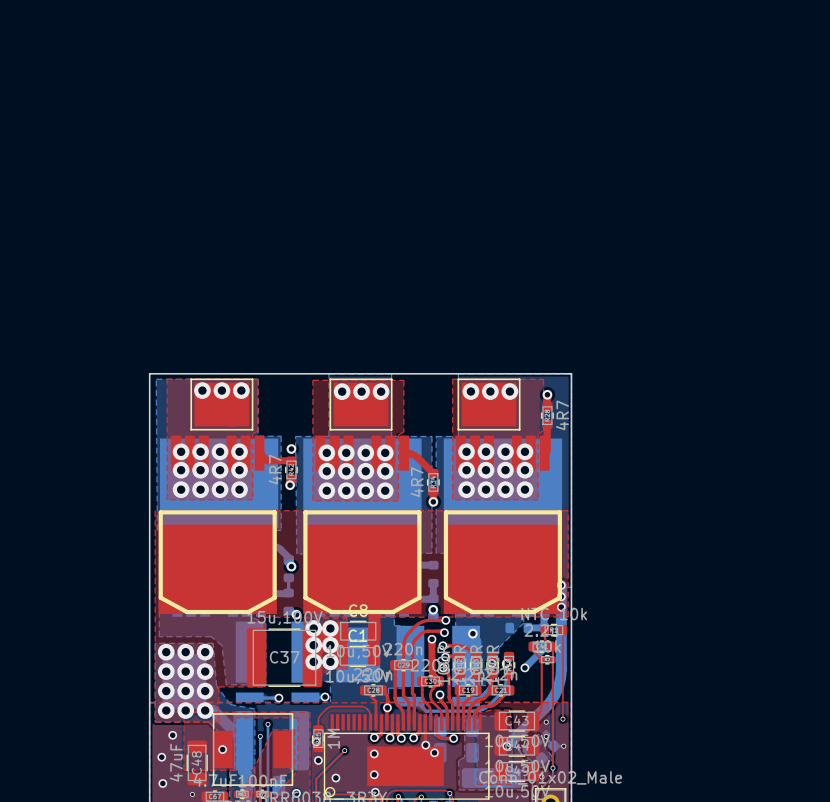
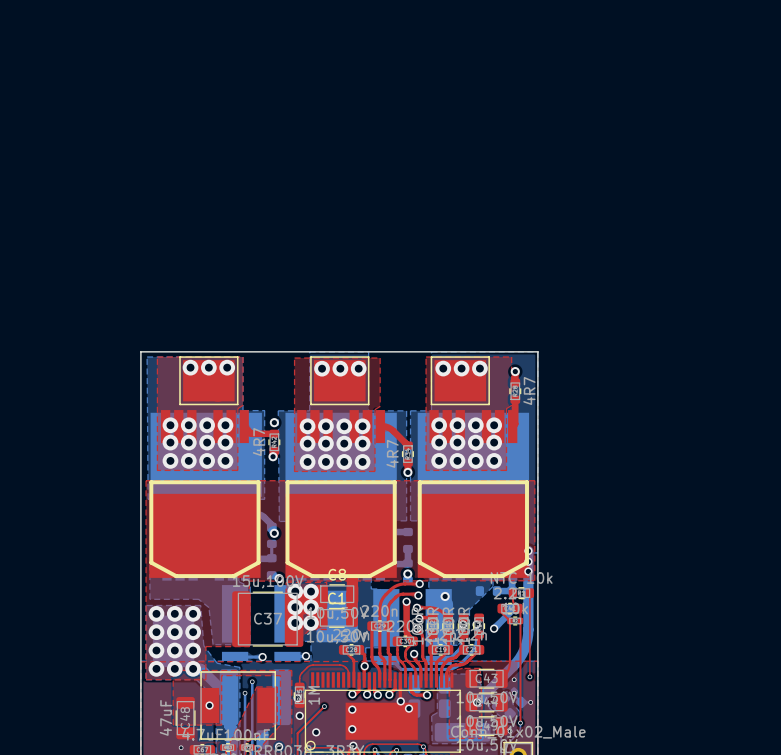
via: (172, 735) -> none
via: (161, 757) -> none
via: (162, 783) -> none

